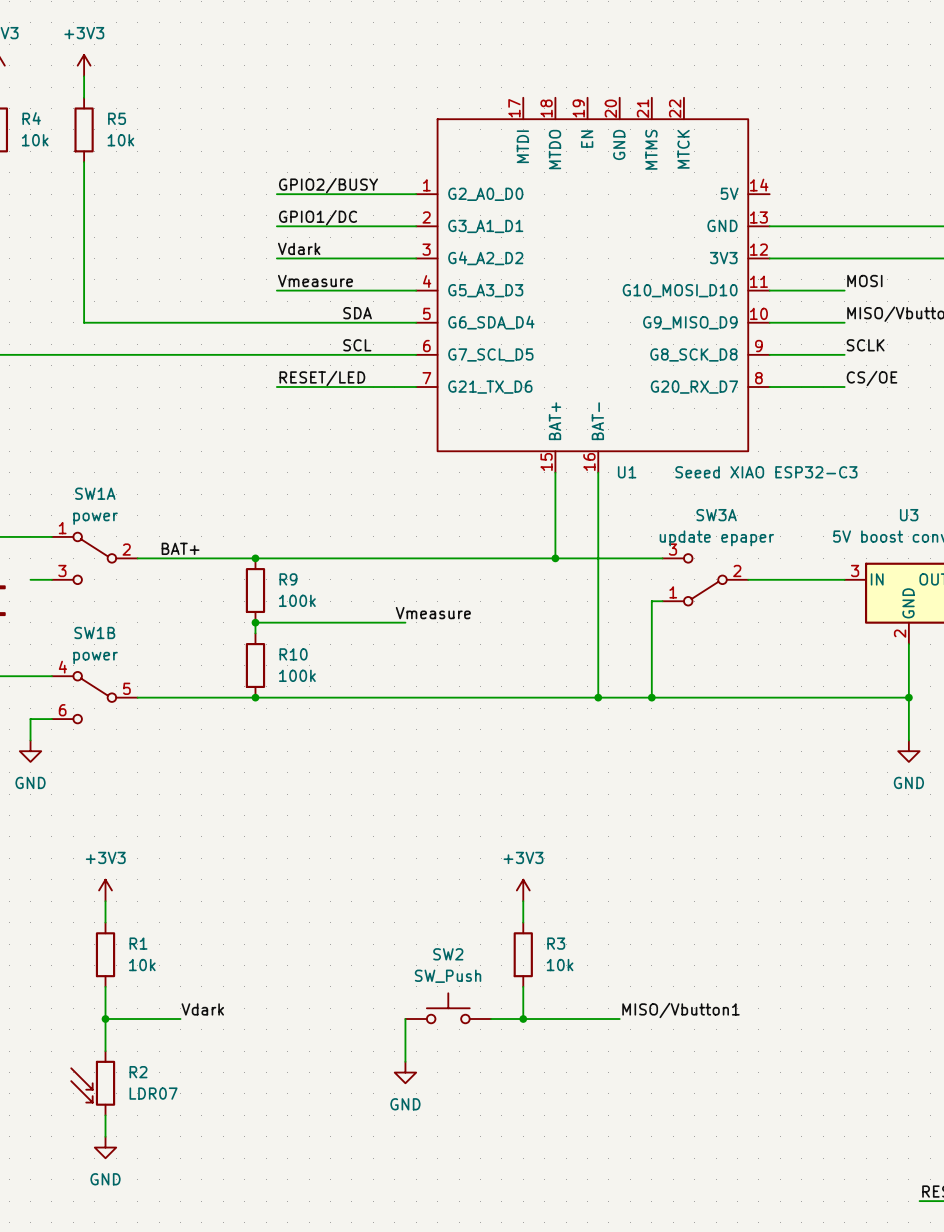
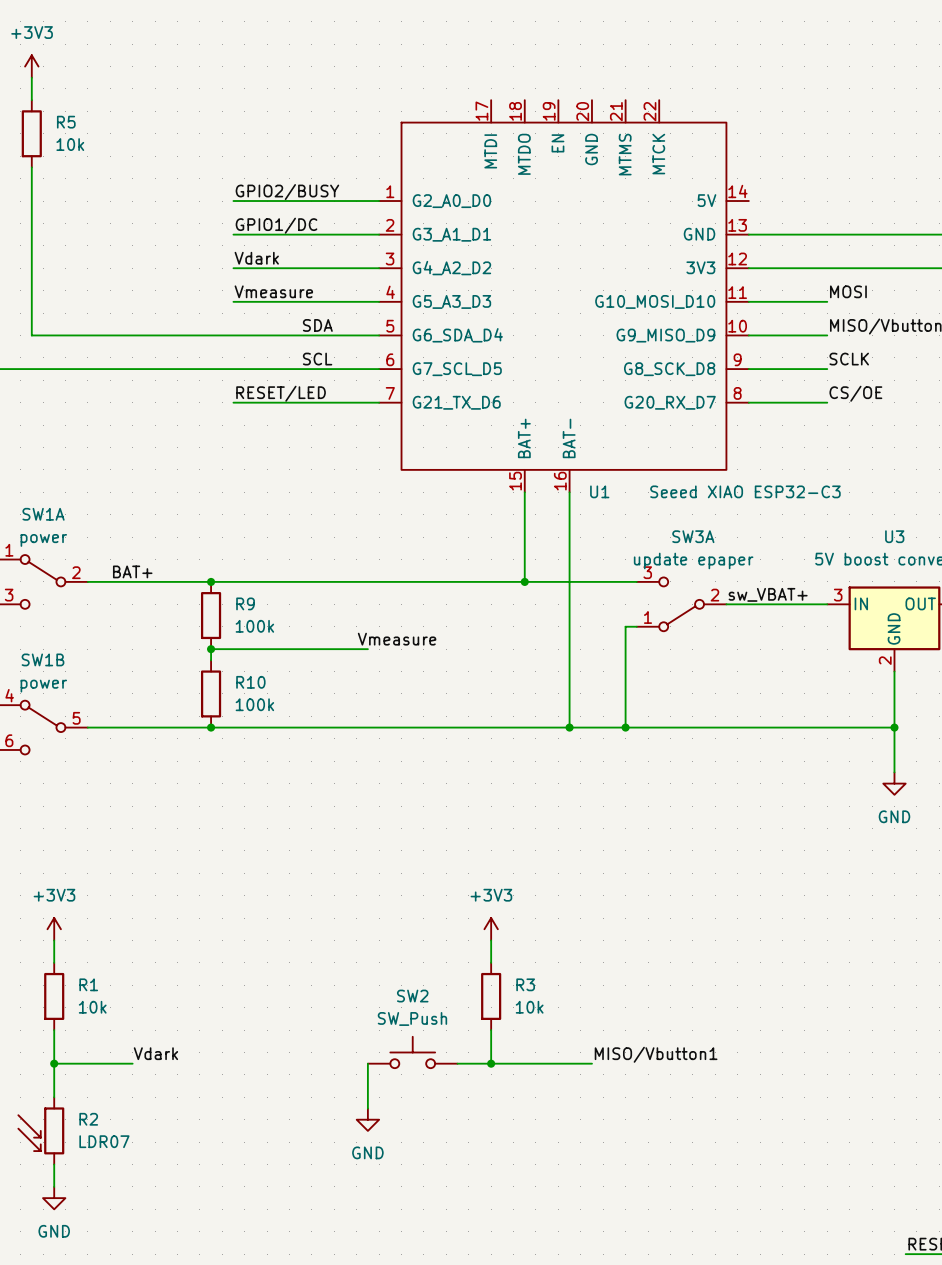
label: none -> sw_VBAT+ (768, 594)

